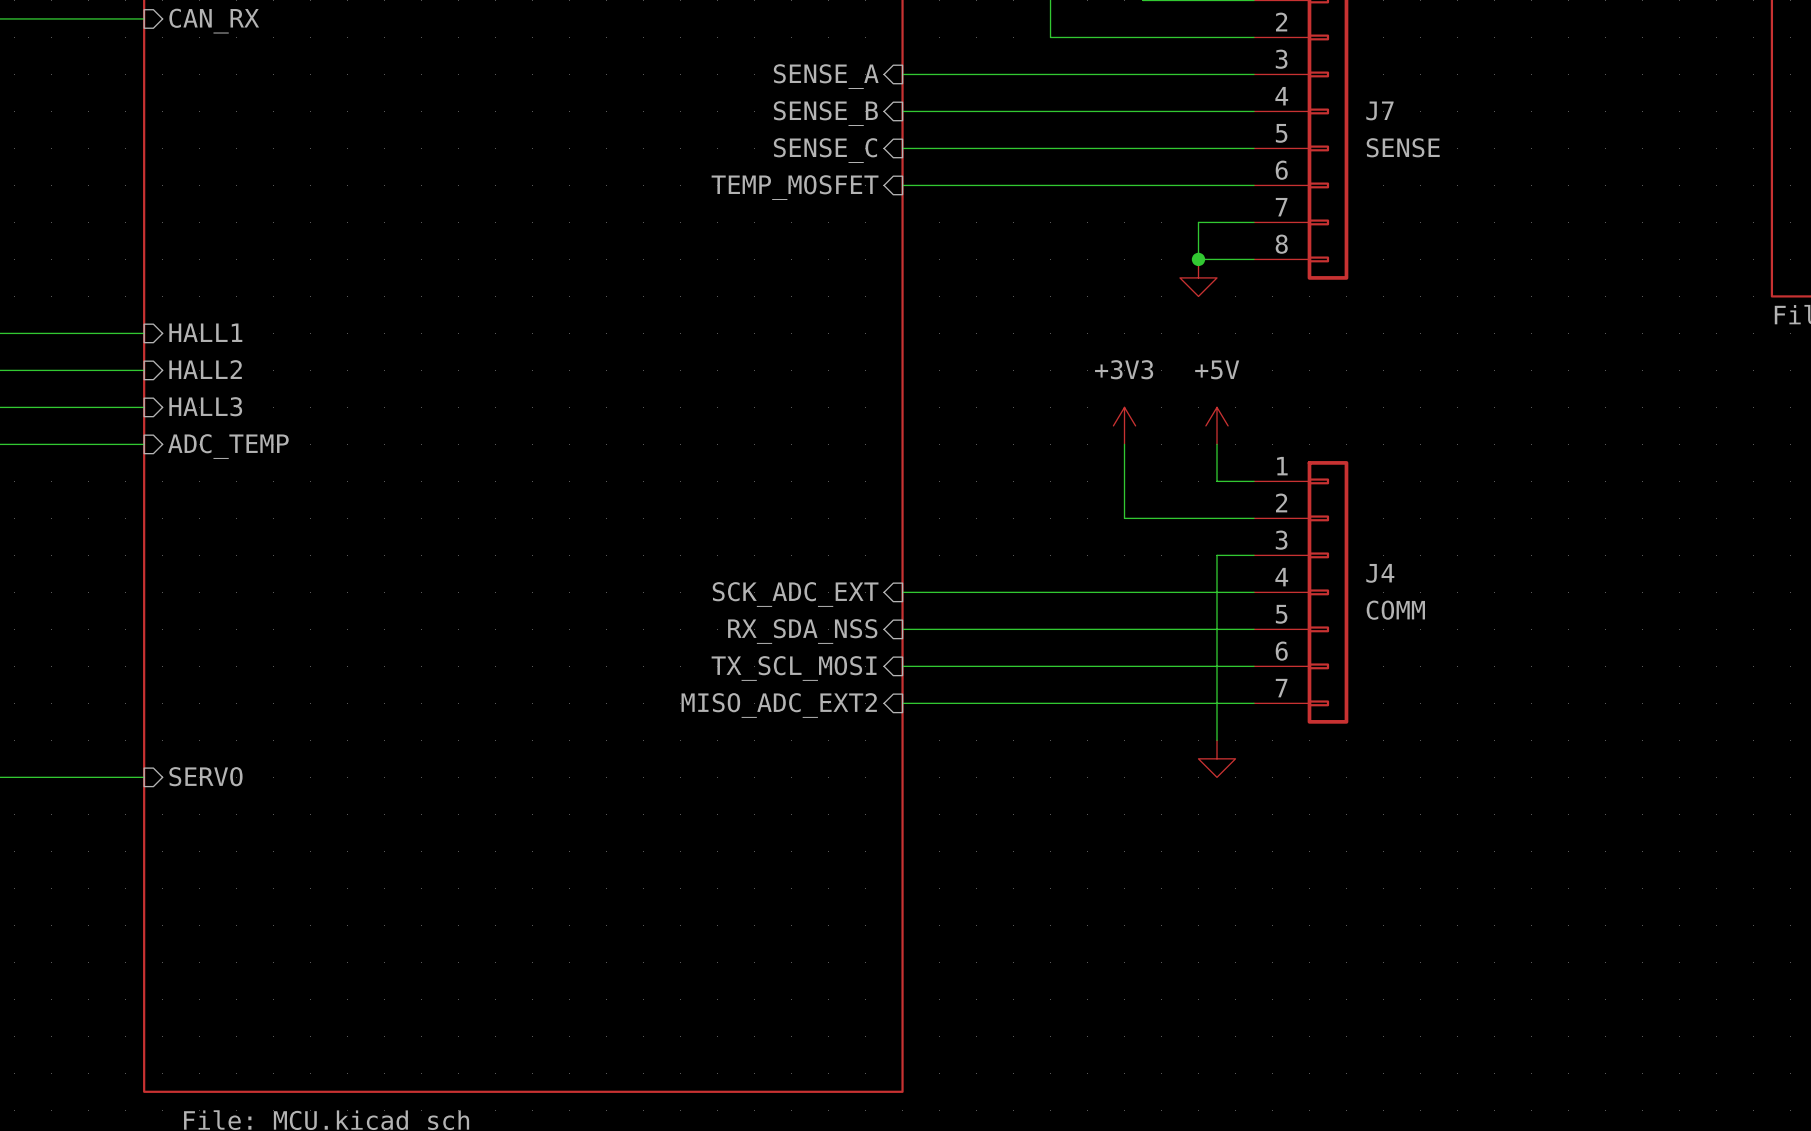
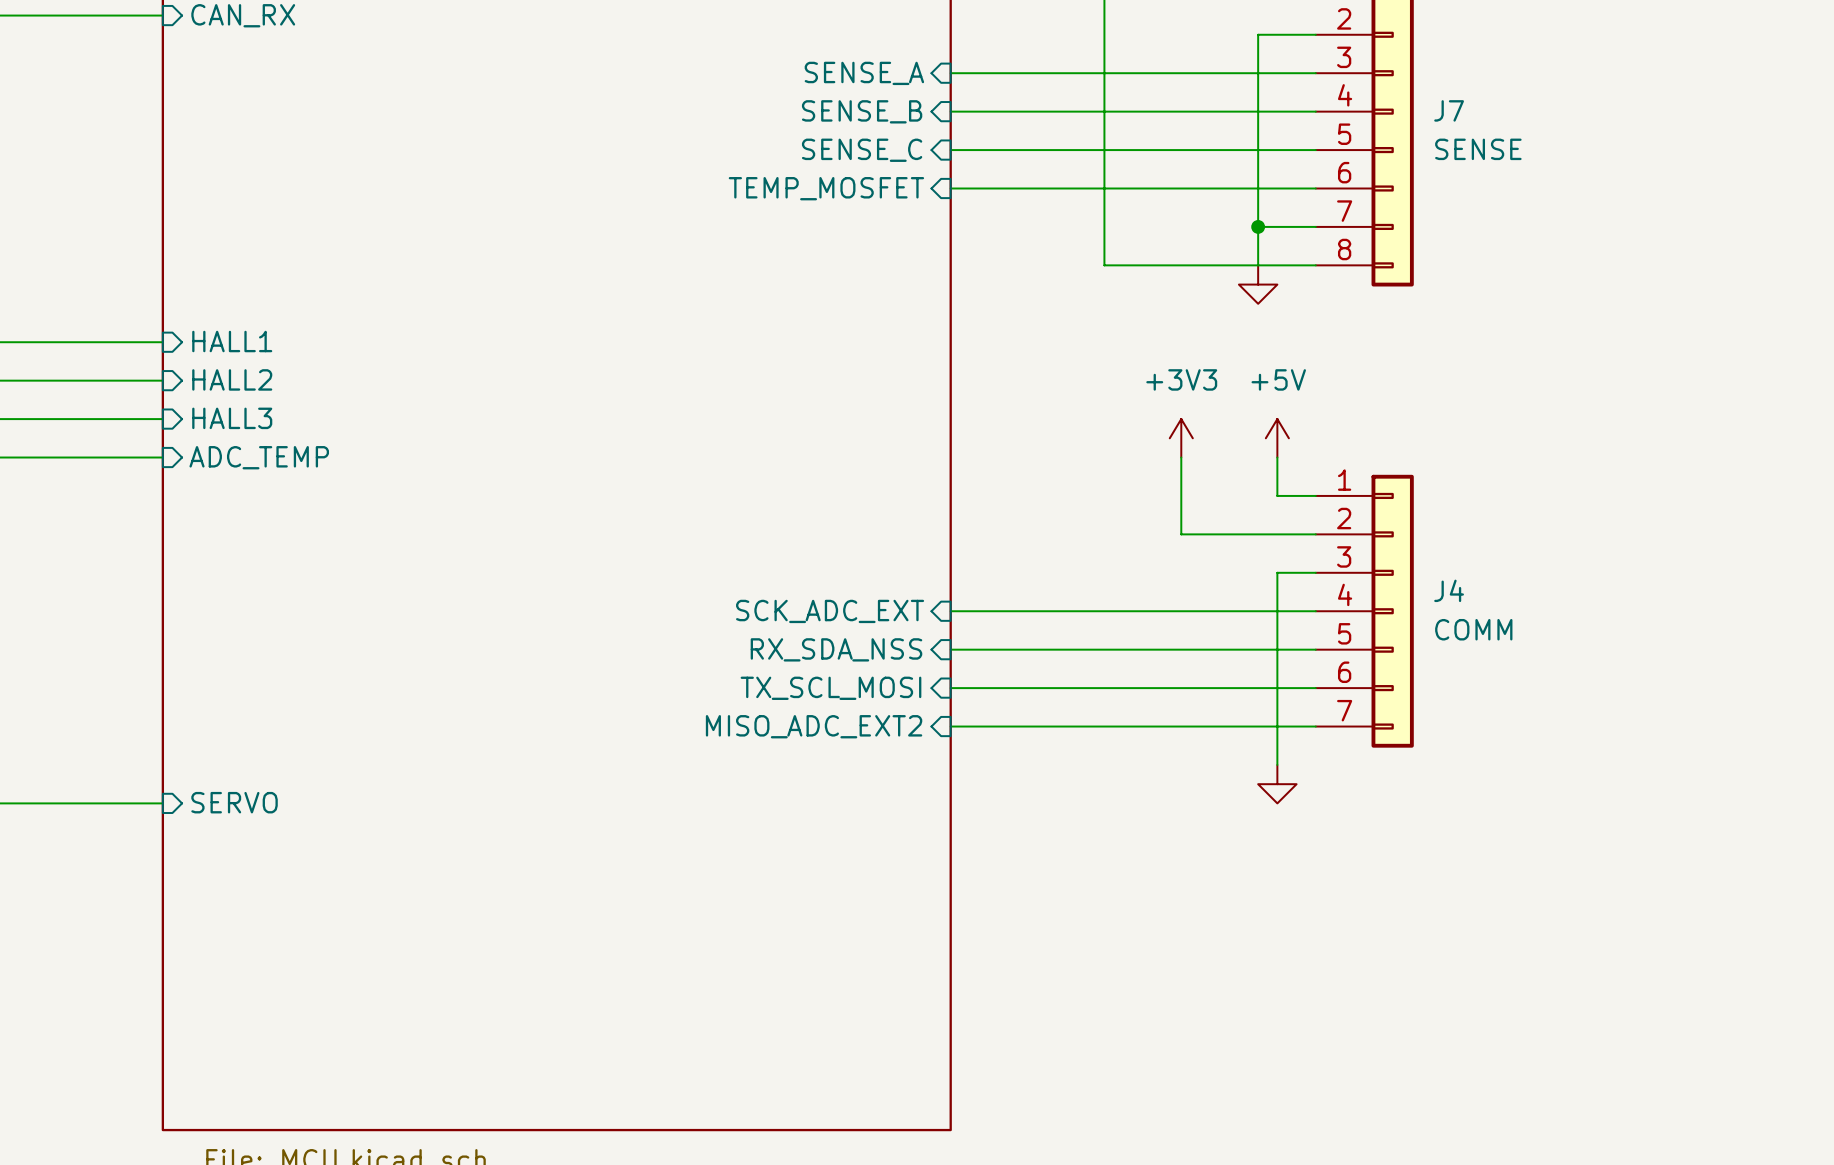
wire: (1050, 37) (1198, 37) -> (1104, 34) (1104, 265) (1258, 265)
wire: none -> (1258, 34) (1258, 226)
junction position: (1198, 259) -> (1258, 226)

